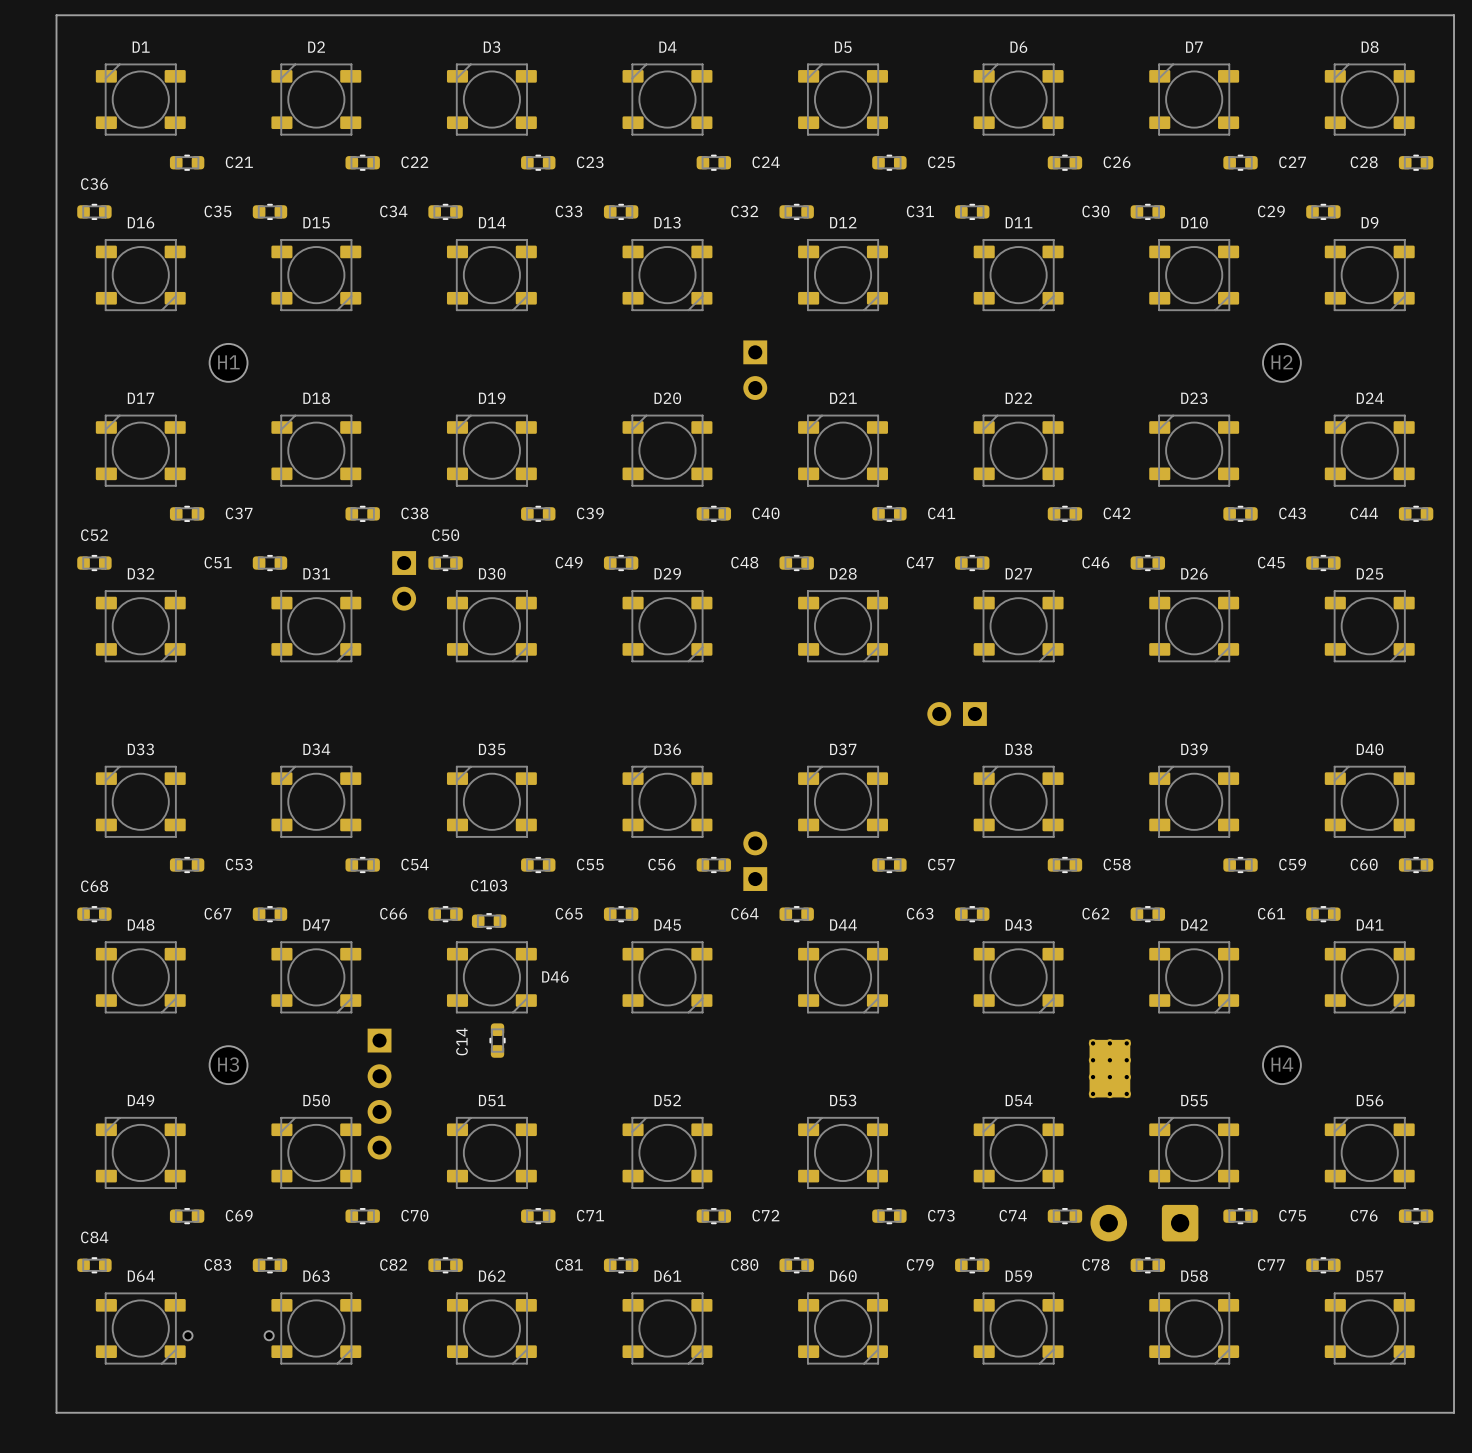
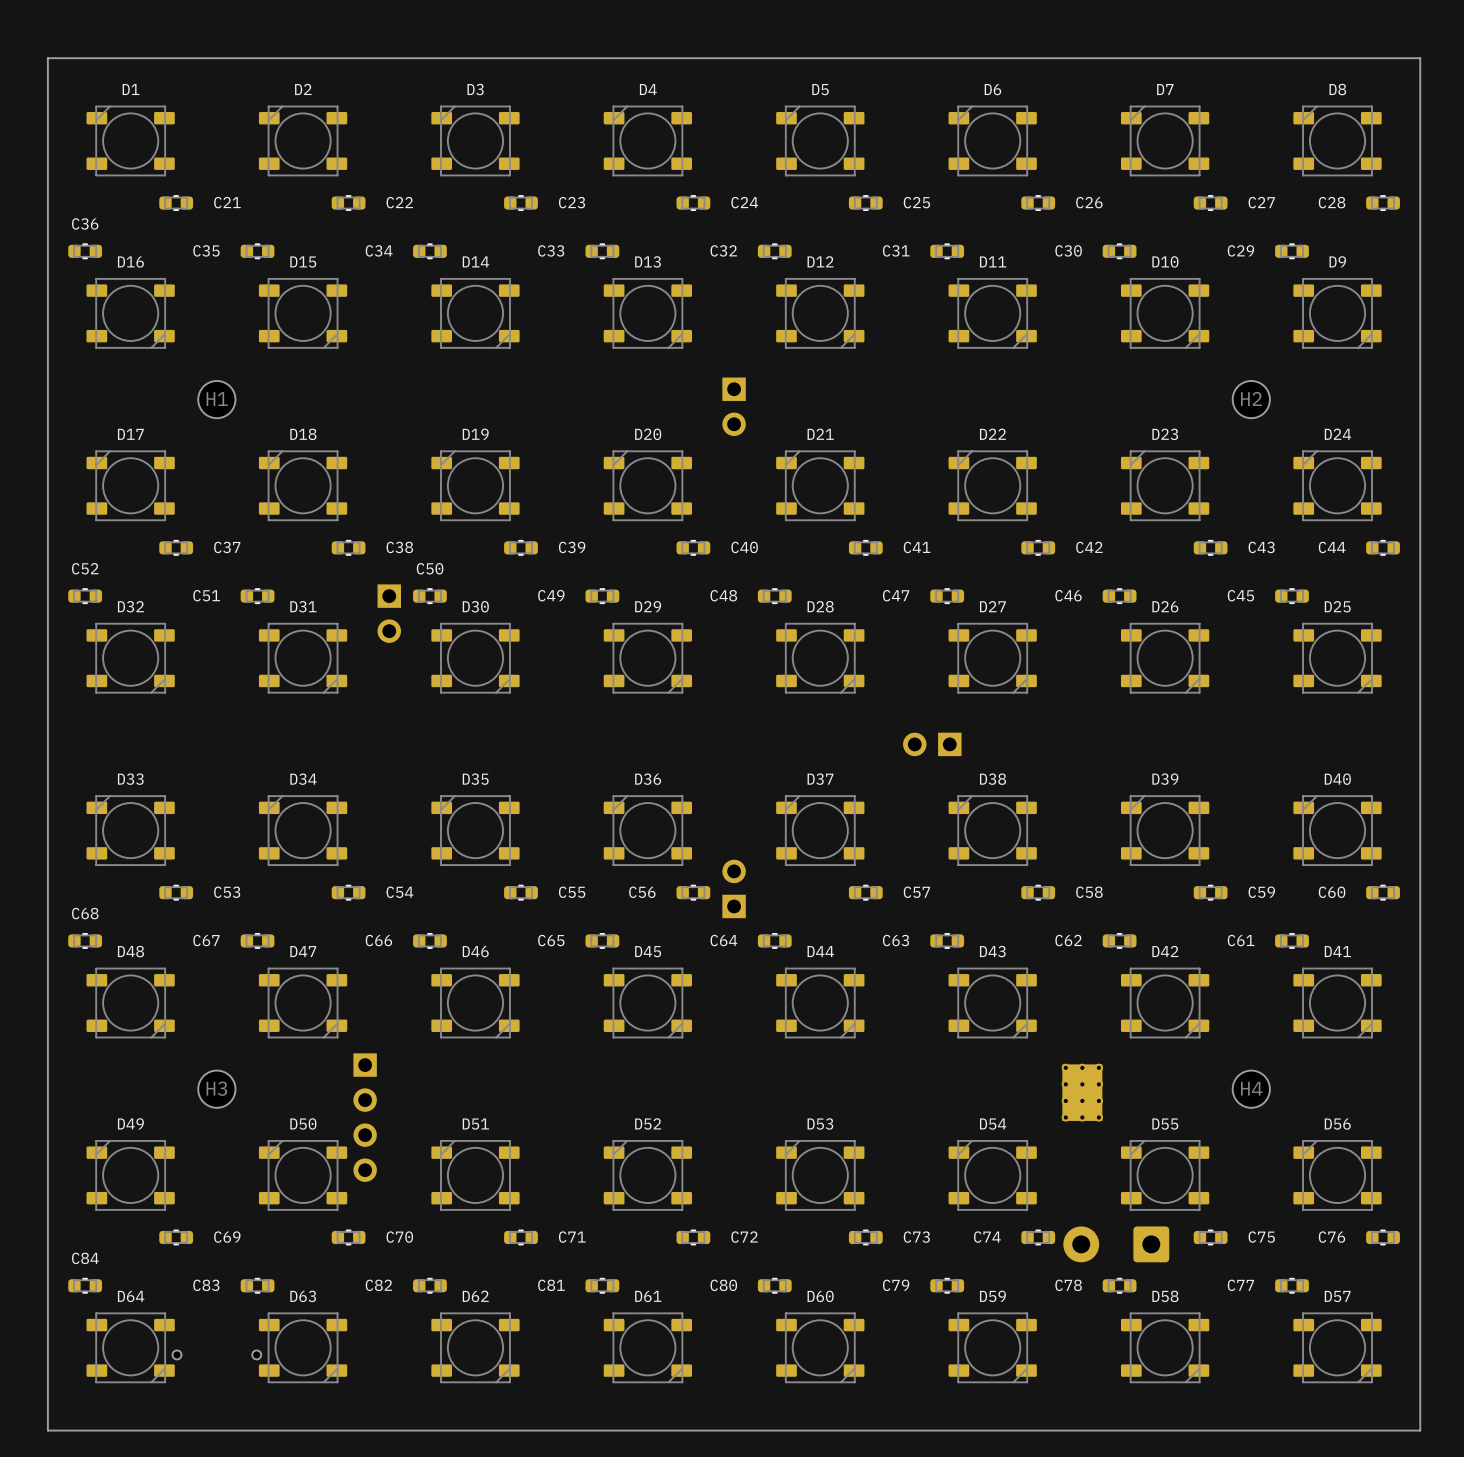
C103: (489, 921) -> none
D46 name position: D46 (555, 977) -> D46 (475, 951)
C14: (497, 1040) -> none

